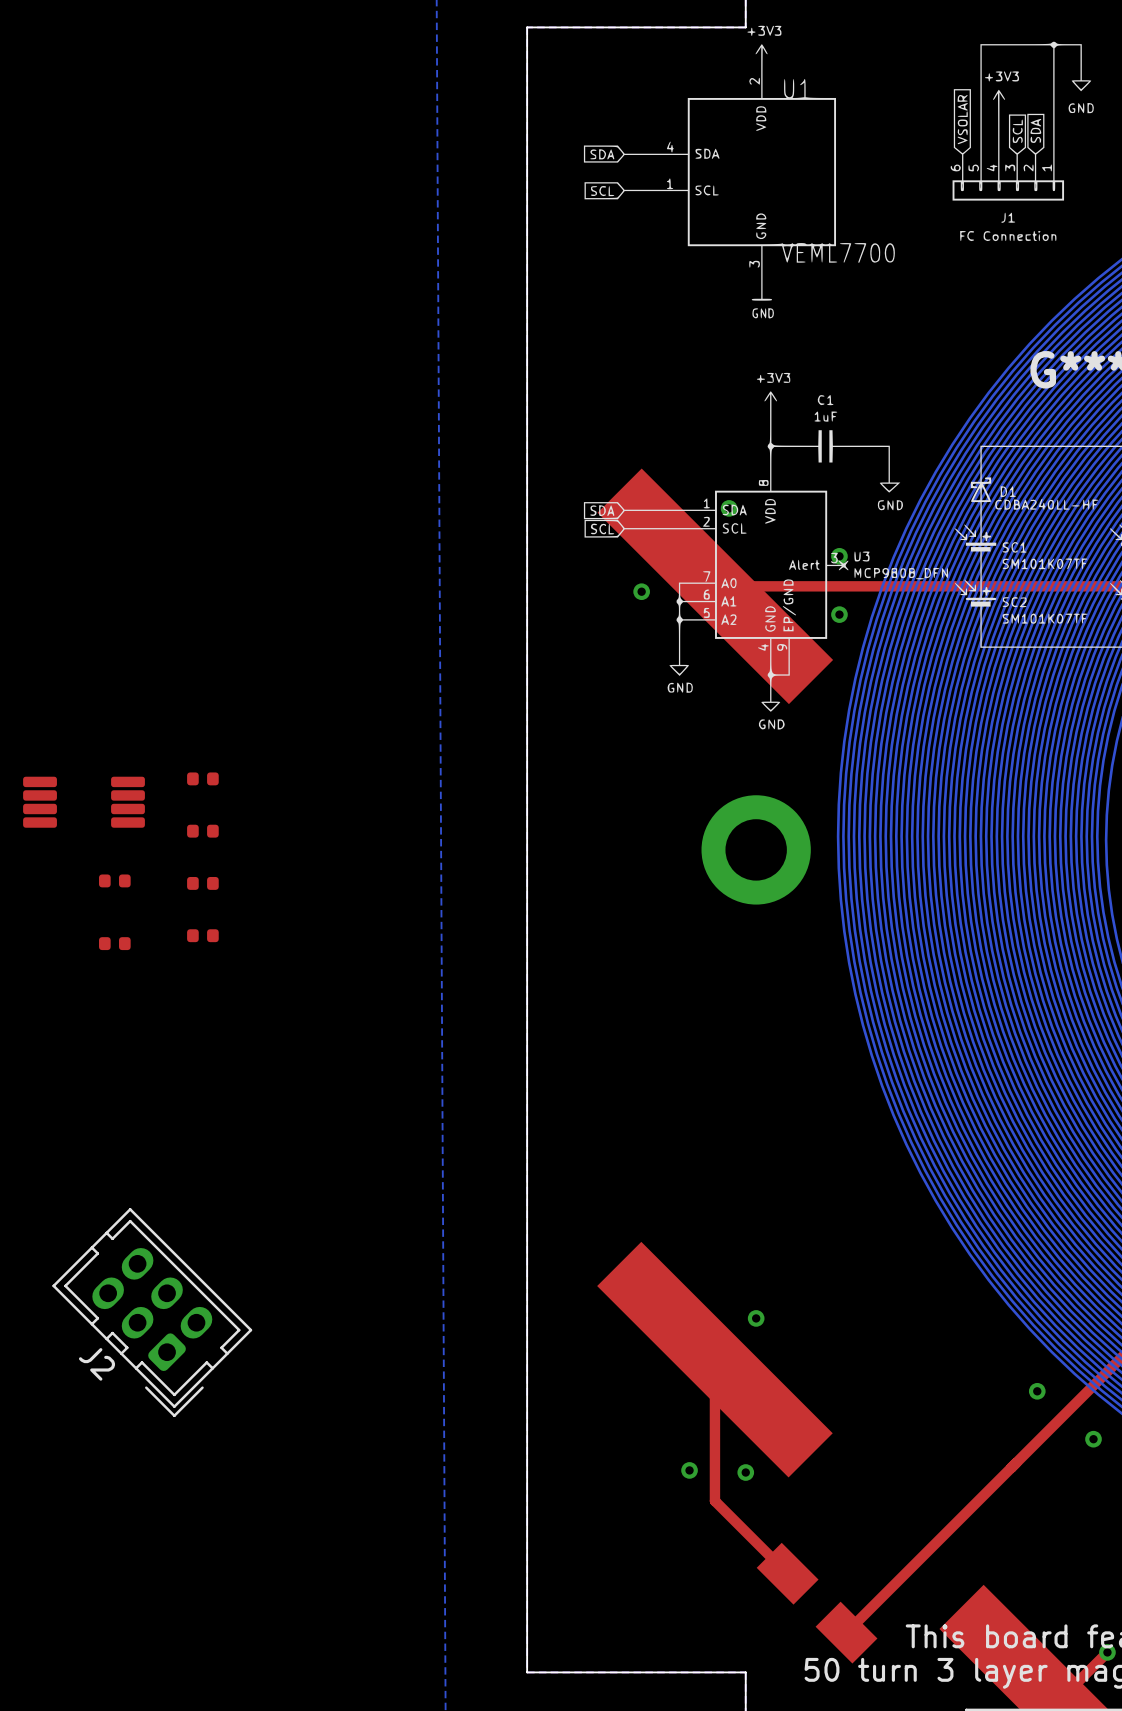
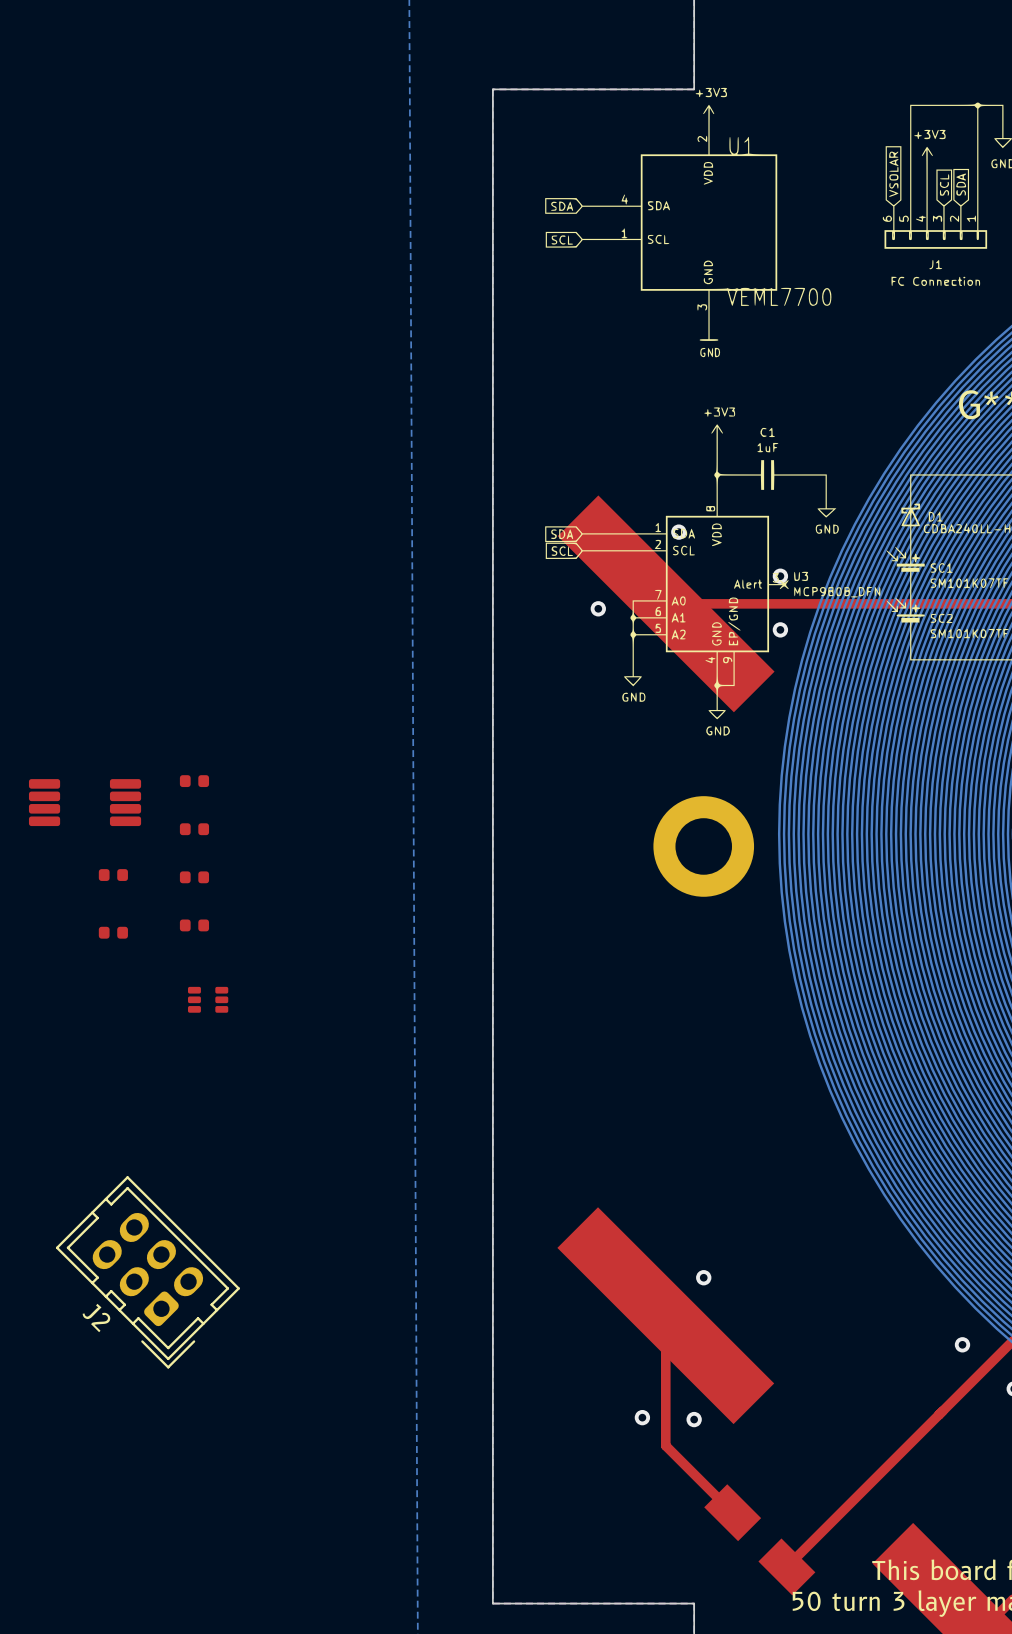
part: none -> (208, 999)

